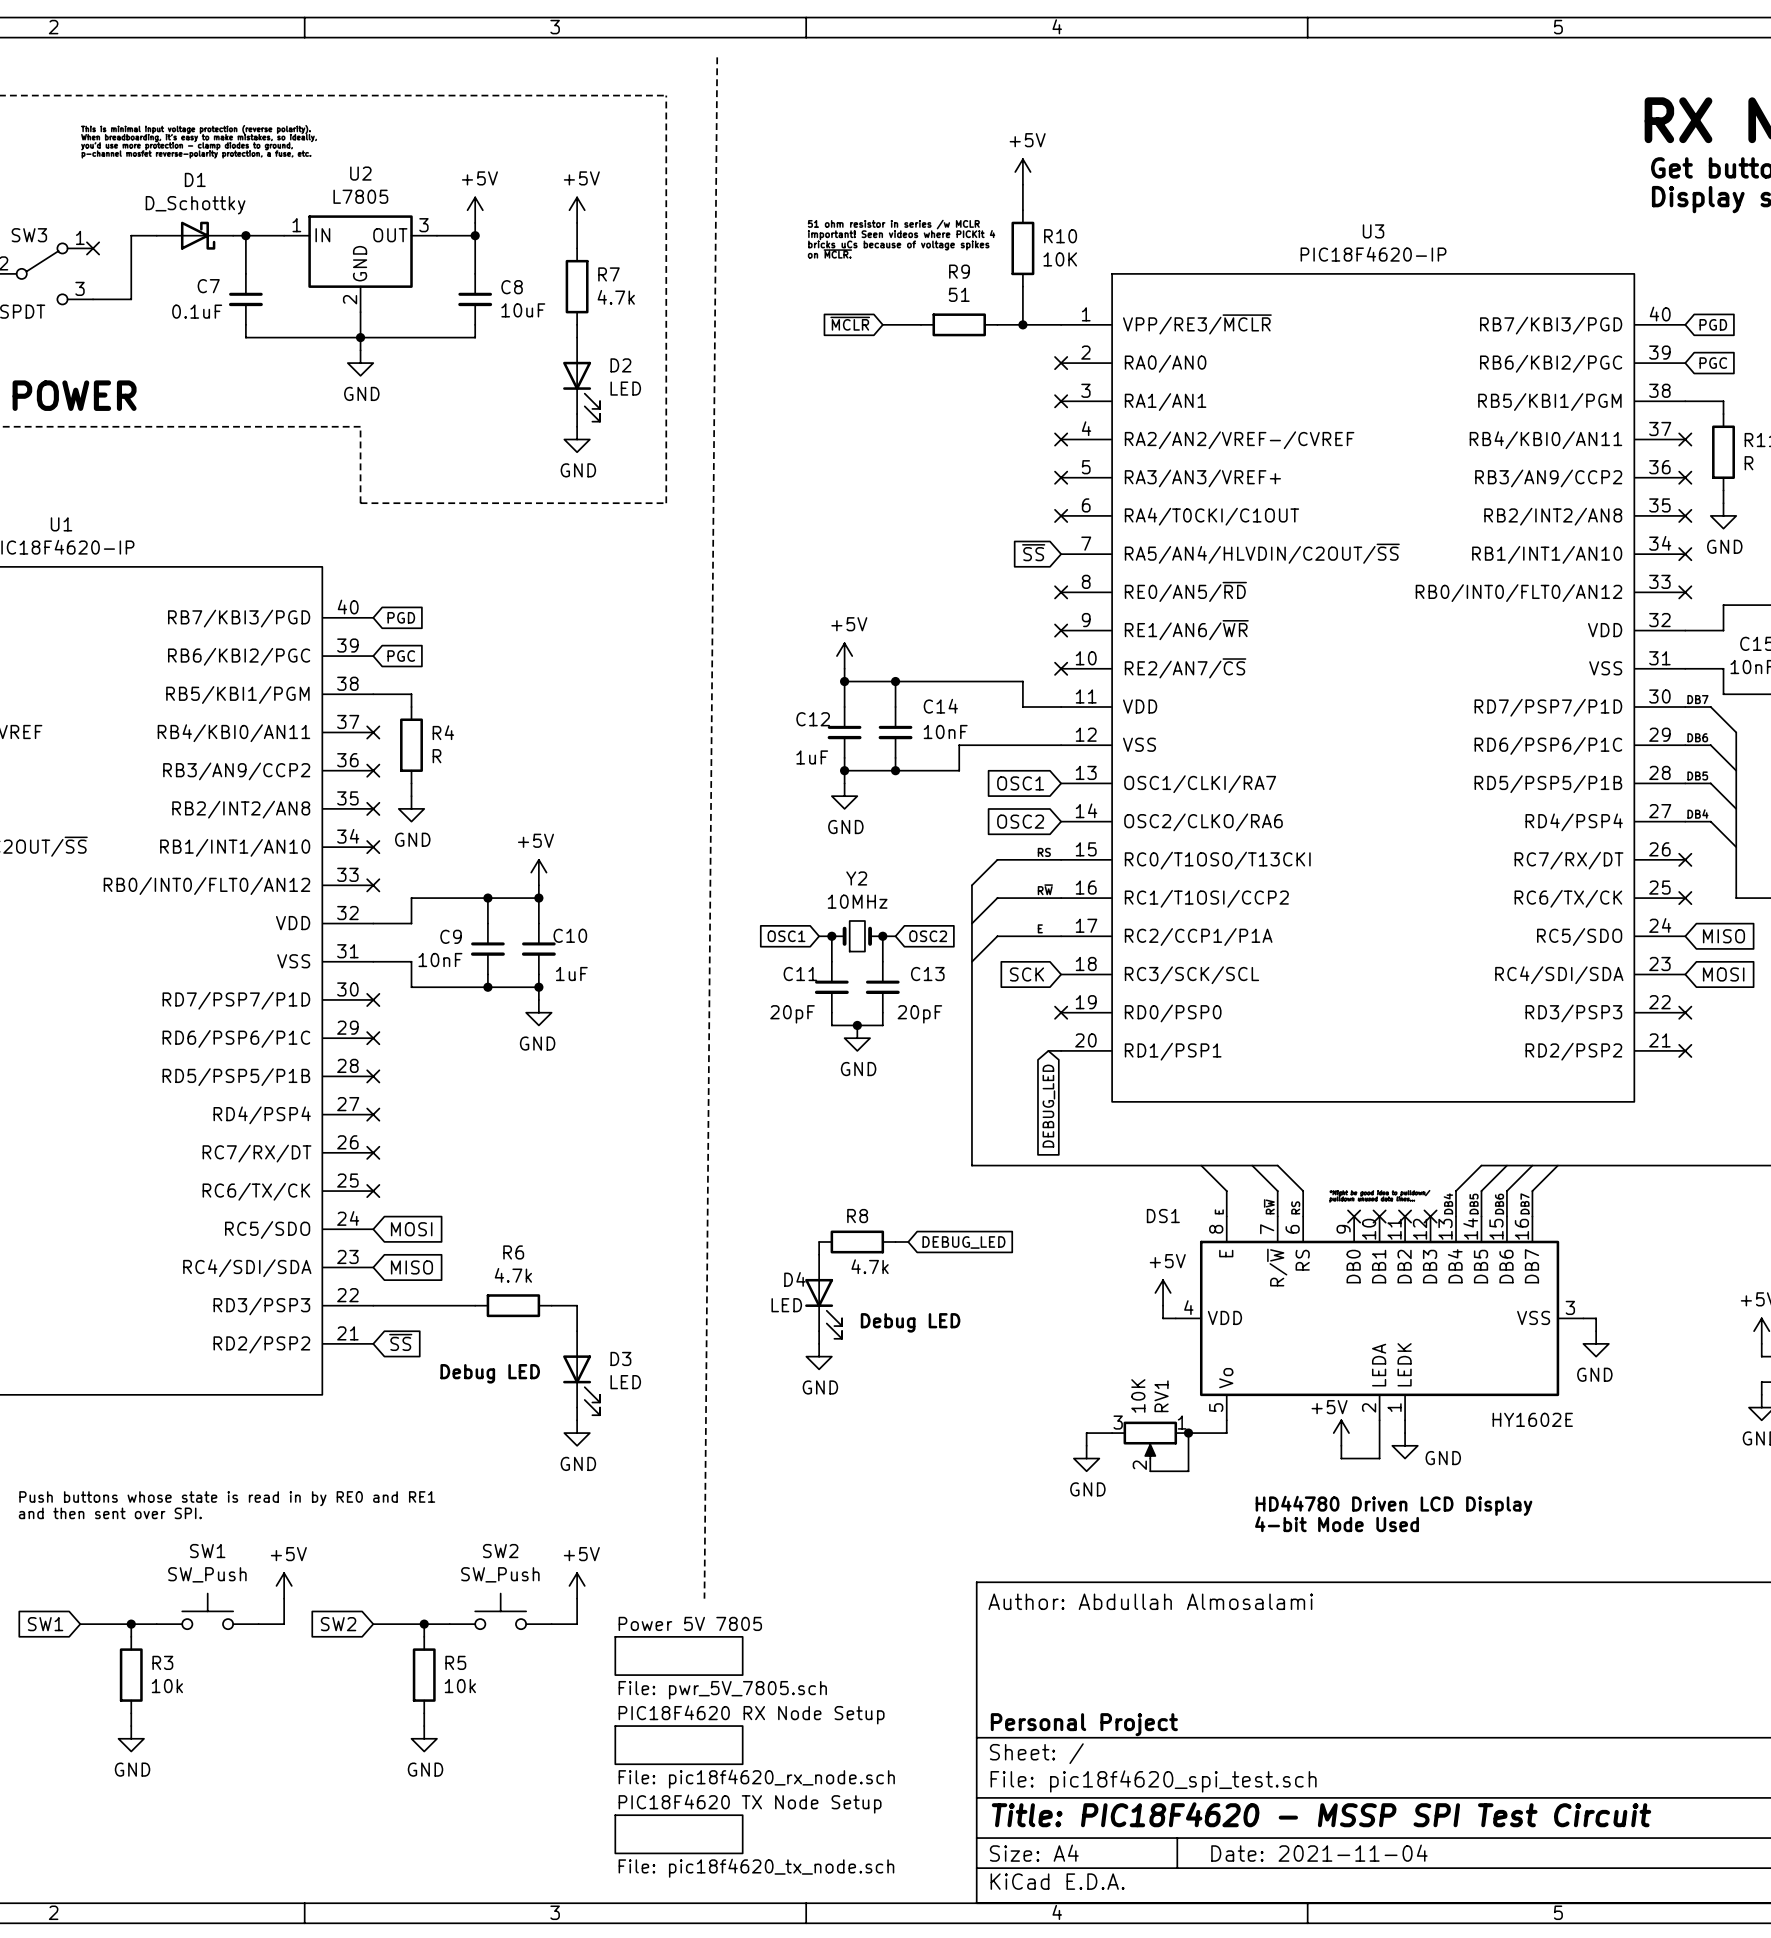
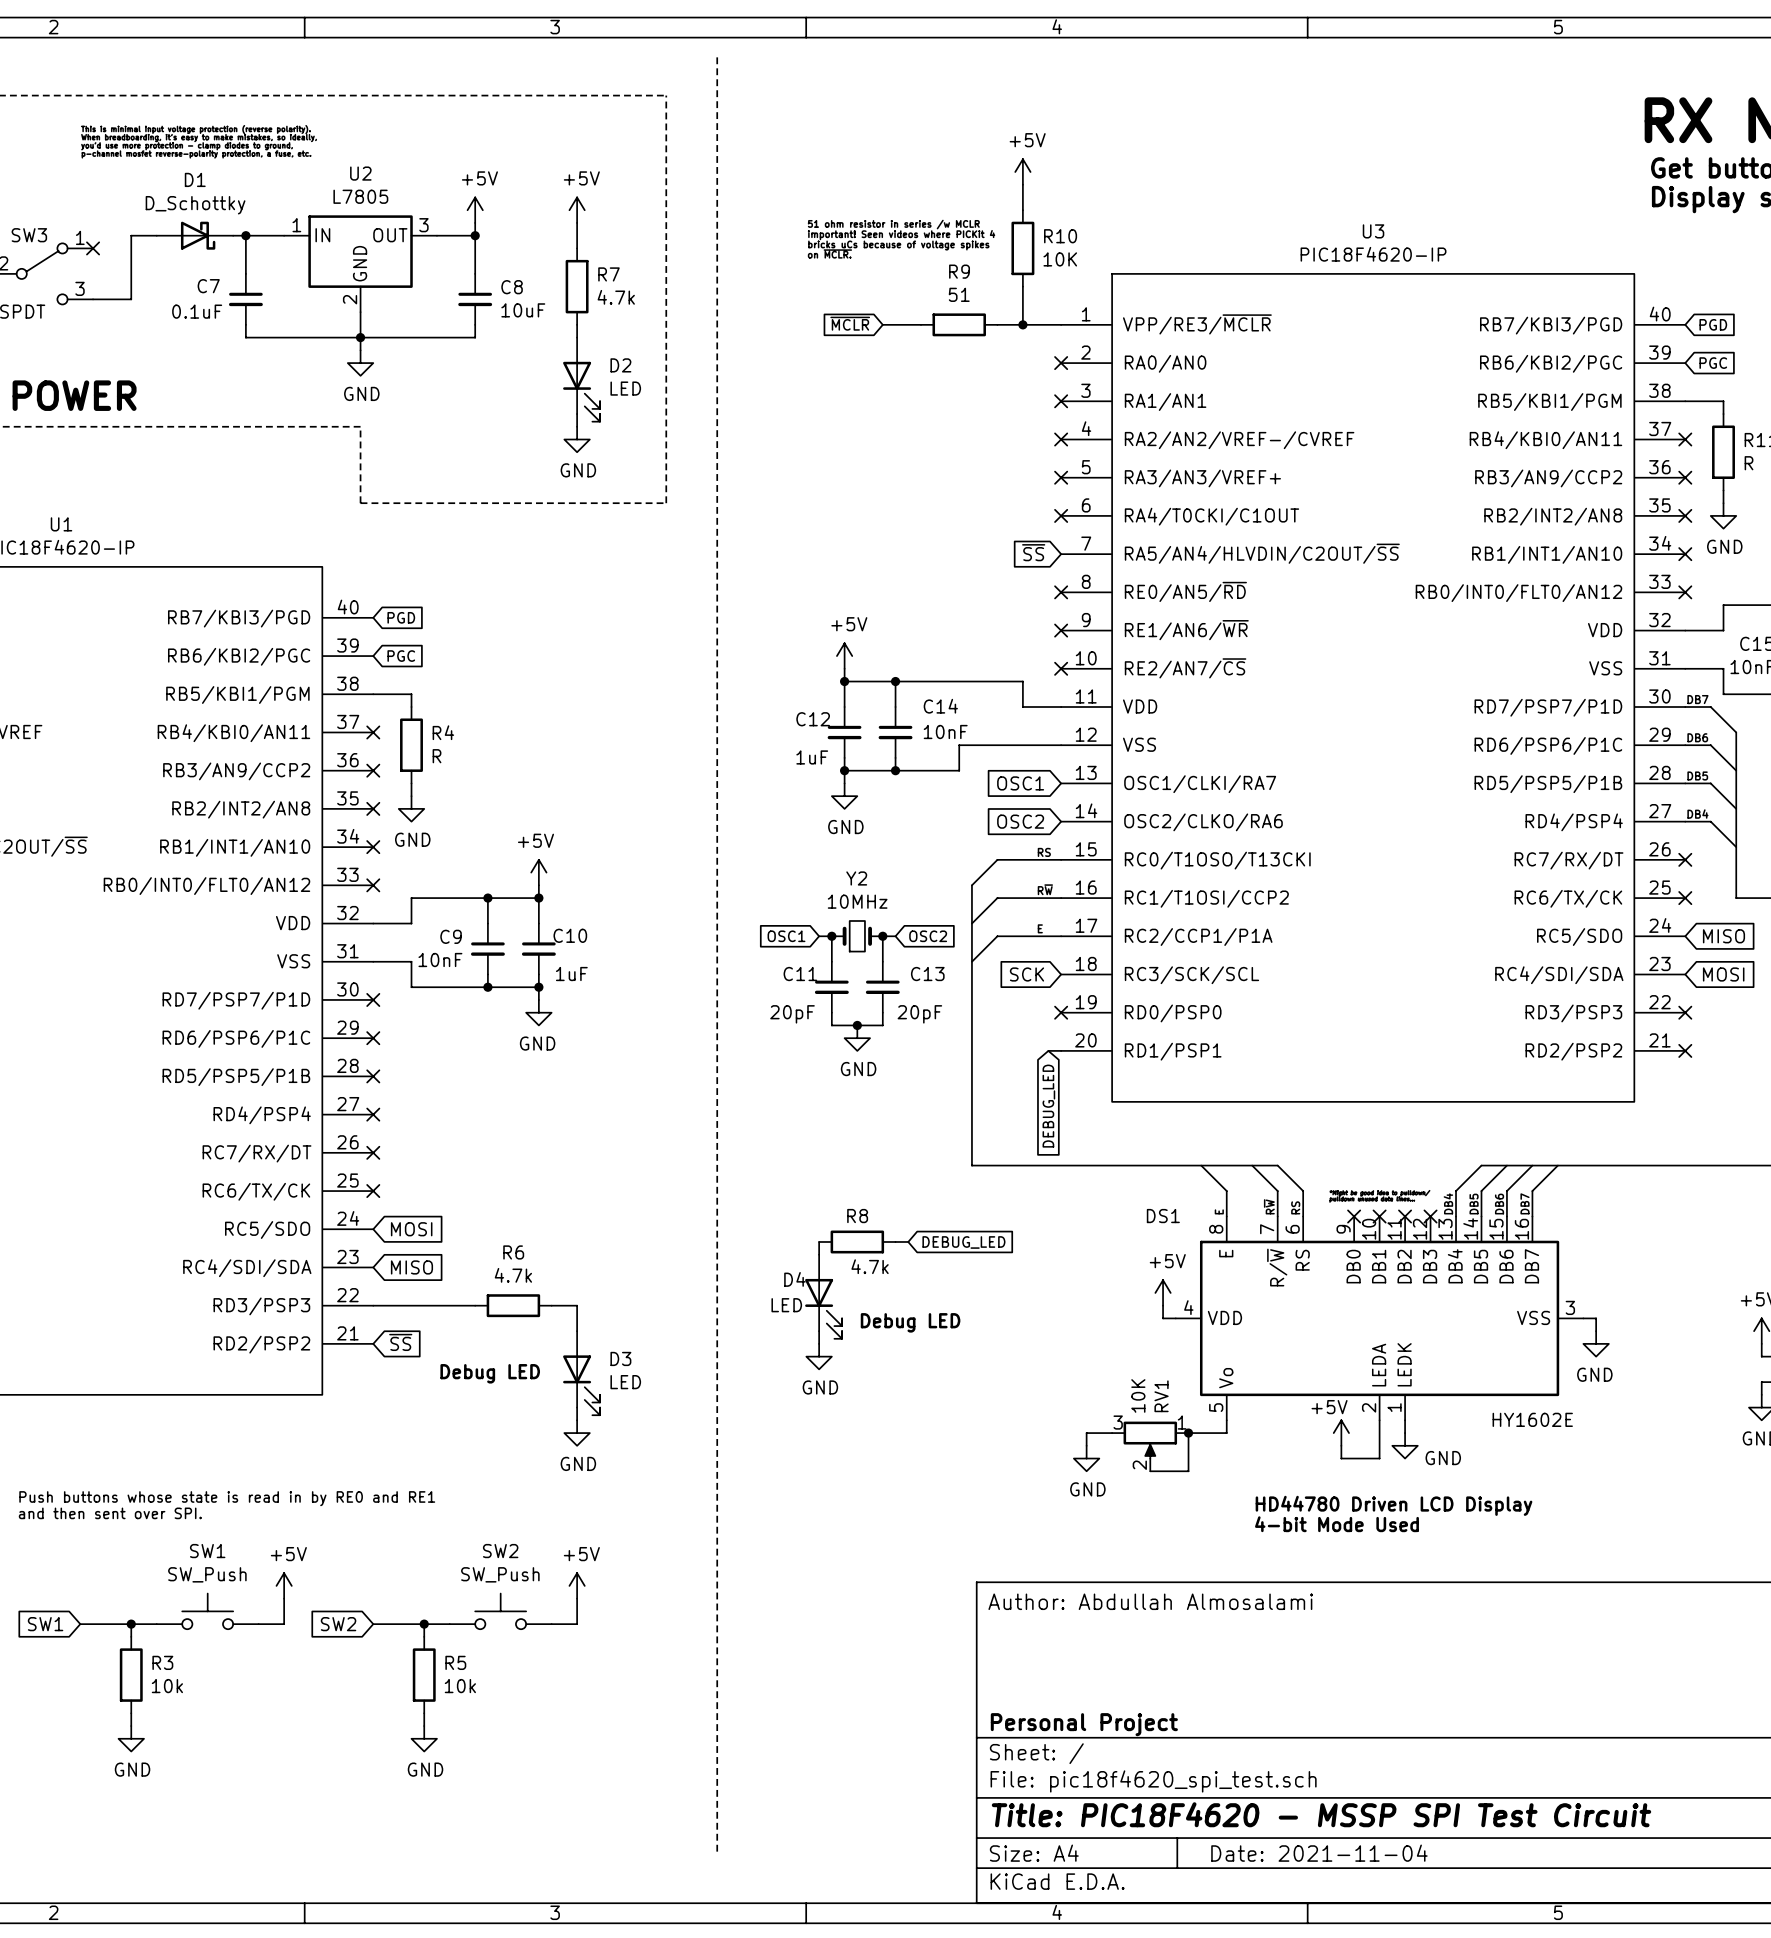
line: (717, 57) (704, 1598) -> (717, 57) (717, 1853)
sheet Power 5V 7805: File: pwr_5V_7805.sch (679, 1655) -> none
sheet PIC18F4620 RX Node Setup: File: pic18f4620_rx_node.sch (679, 1745) -> none
sheet PIC18F4620 TX Node Setup: File: pic18f4620_tx_node.sch (679, 1834) -> none

